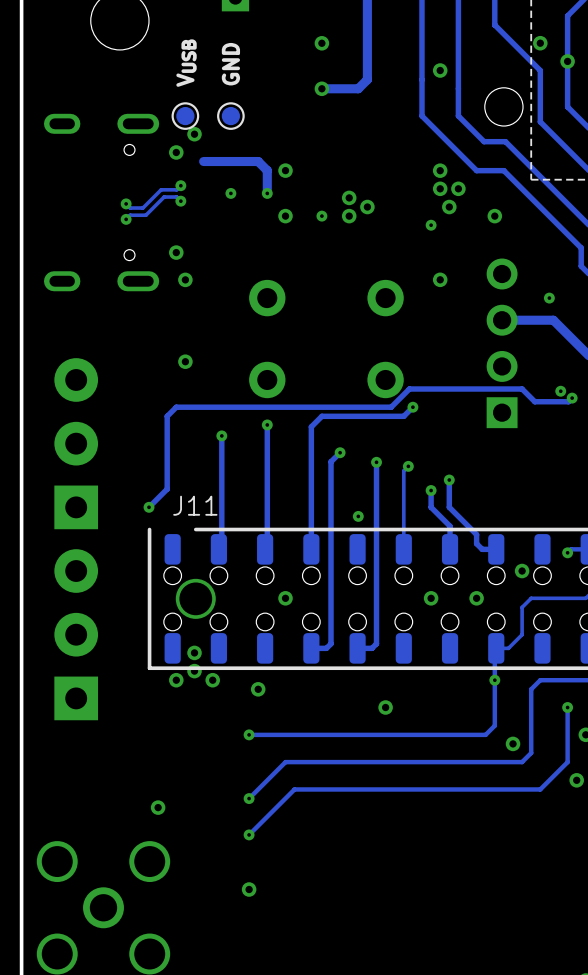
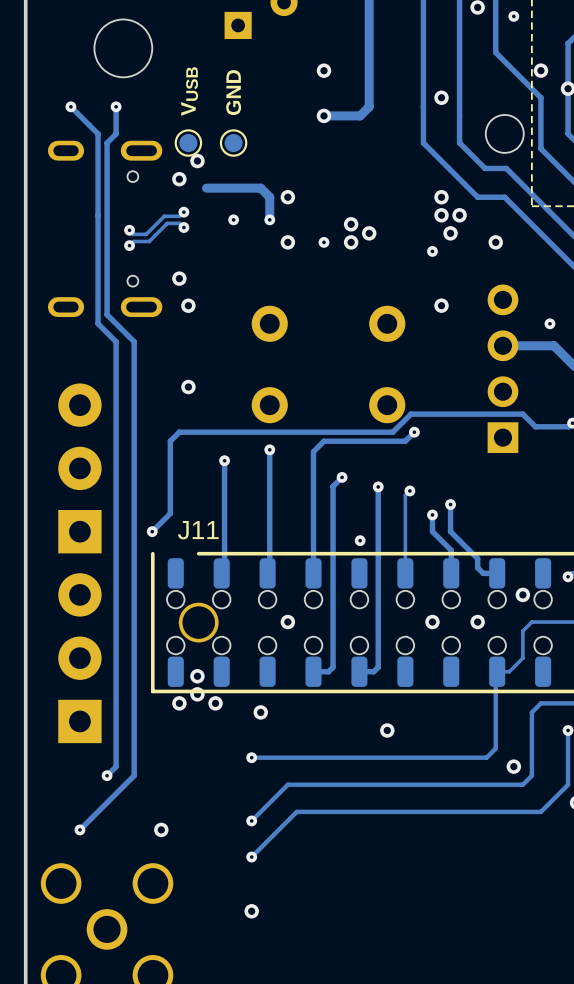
track: none -> (70, 106) (98, 133) (98, 323) (116, 341) (116, 766) (107, 775)
via: none -> (70, 106)
track: none -> (116, 106) (116, 133) (107, 142) (107, 314) (134, 341) (134, 775) (79, 829)
via: none -> (116, 106)
via: (560, 391) -> none
via: (494, 680) -> none
via: none -> (107, 775)
via: none -> (79, 829)

